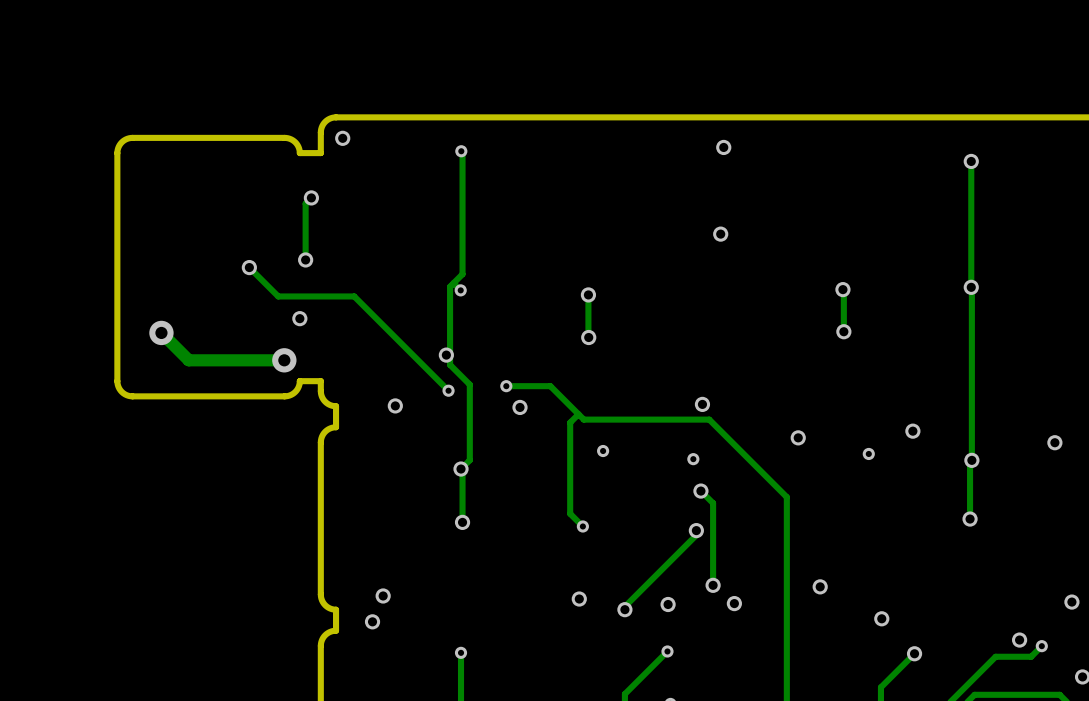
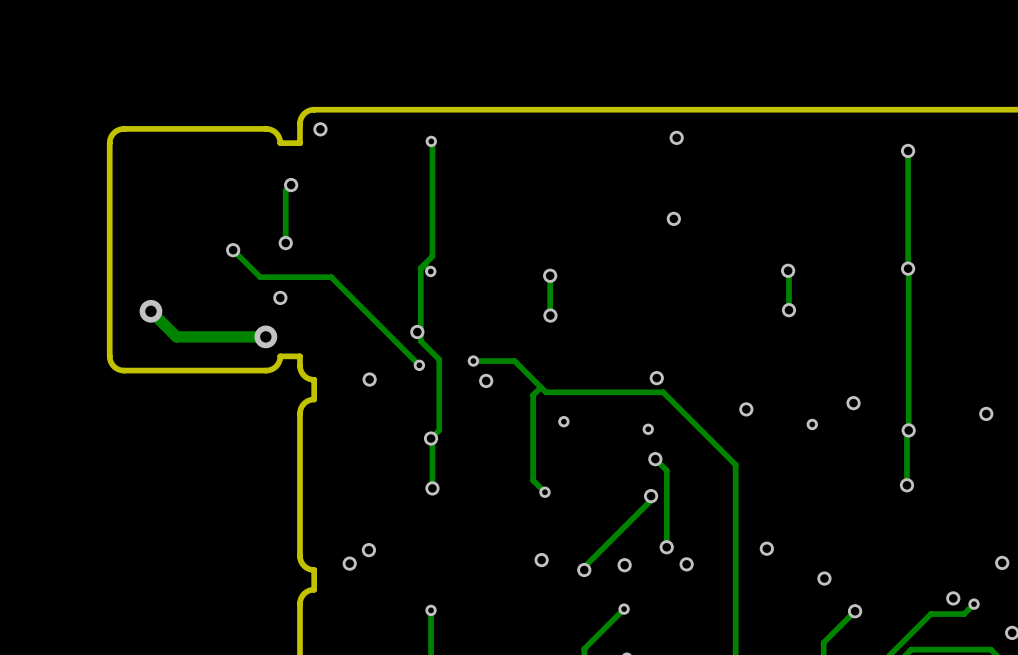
via: none -> (368, 550)
via: (383, 595) -> none
via: none -> (349, 563)
via: (372, 621) -> none

